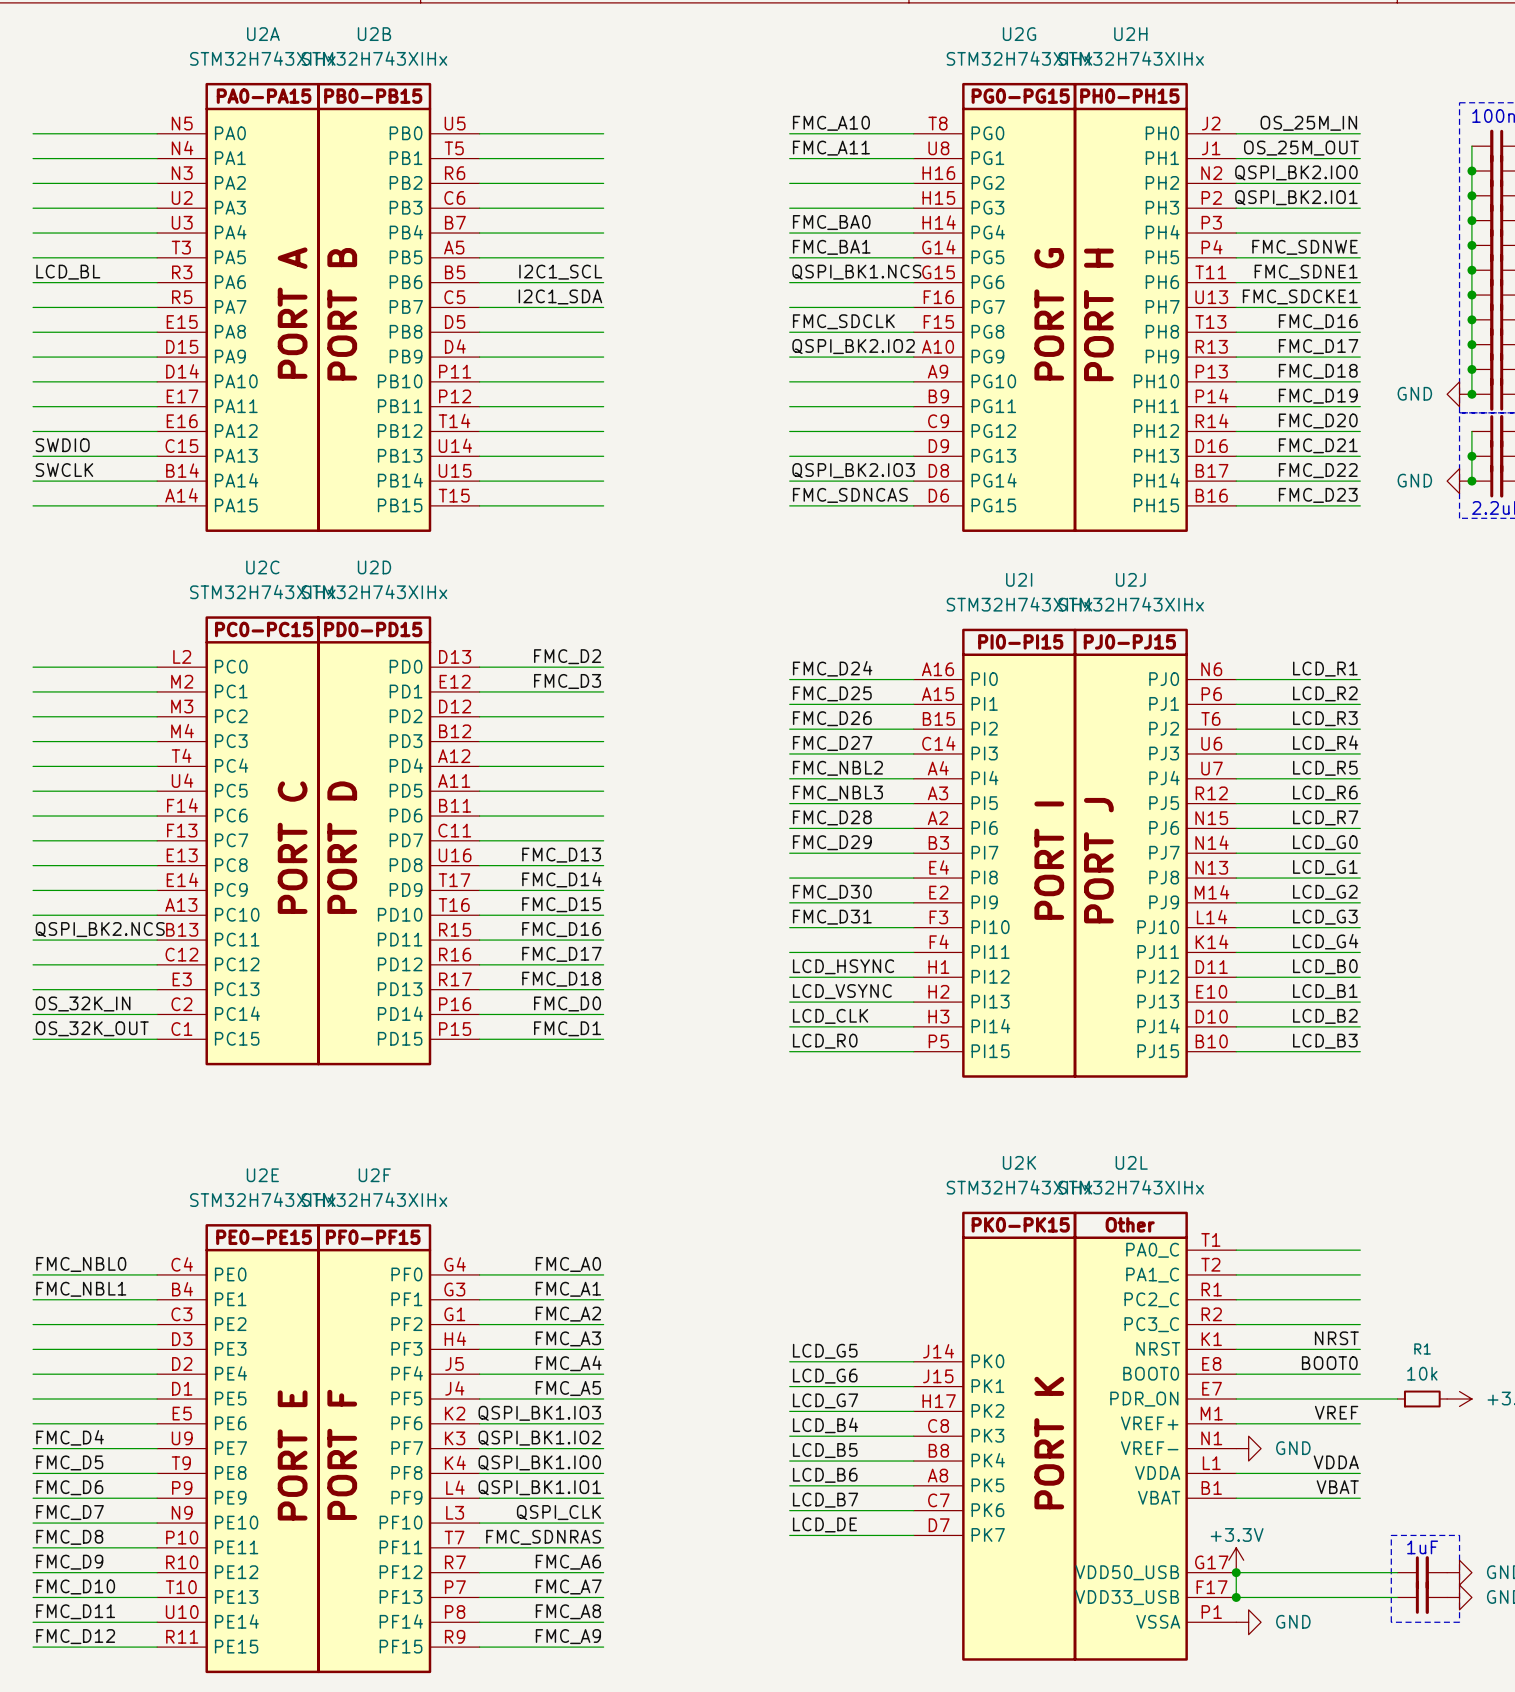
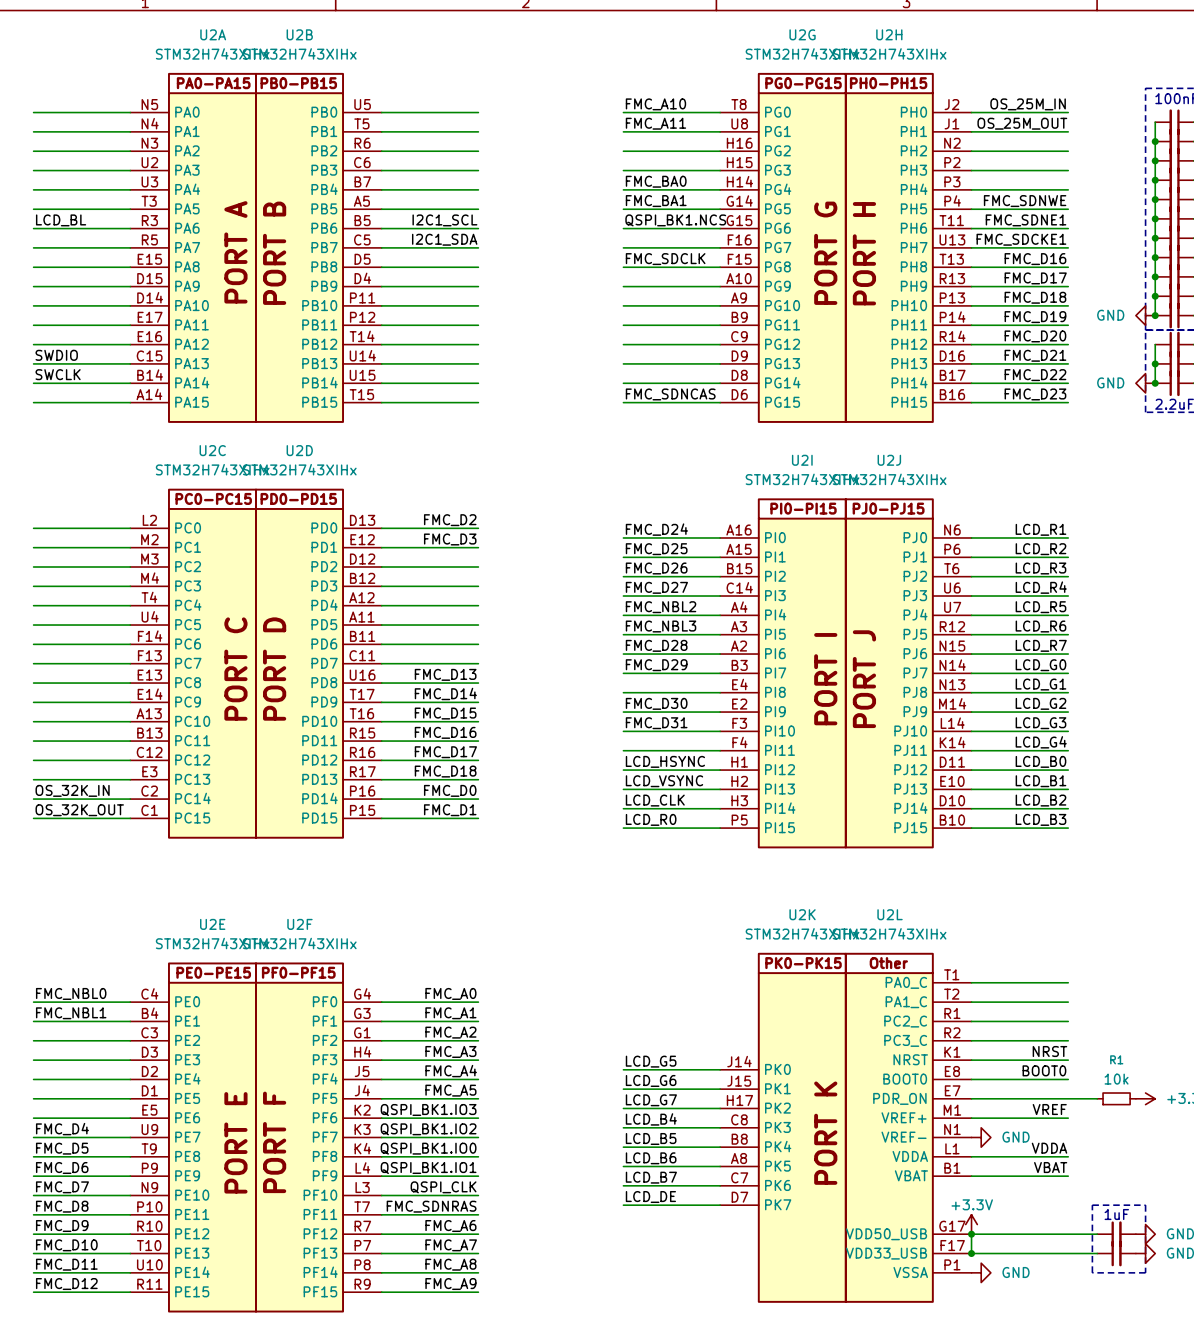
label: QSPI_BK2.IO0 (1296, 172) -> none
label: QSPI_BK2.IO1 (1296, 197) -> none
label: QSPI_BK2.IO2 (853, 346) -> none
label: QSPI_BK2.IO3 (853, 470) -> none
label: QSPI_BK2.NCS (100, 929) -> none

